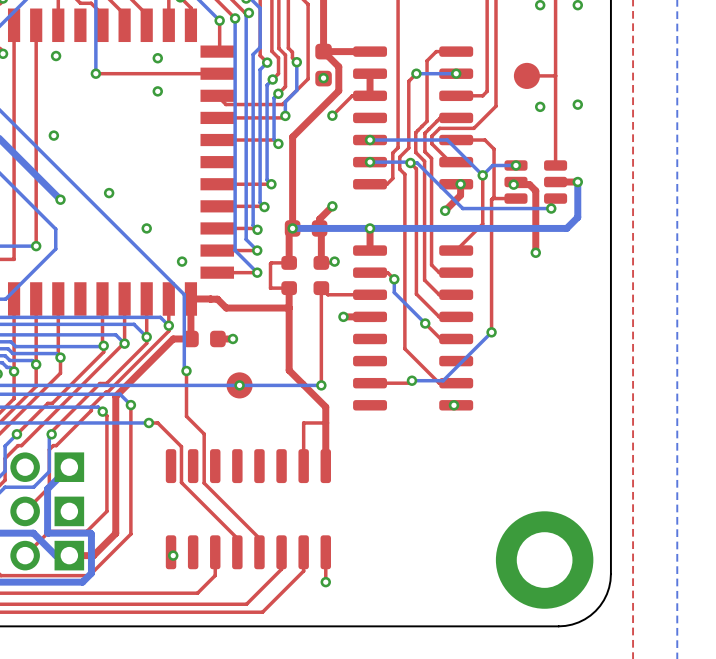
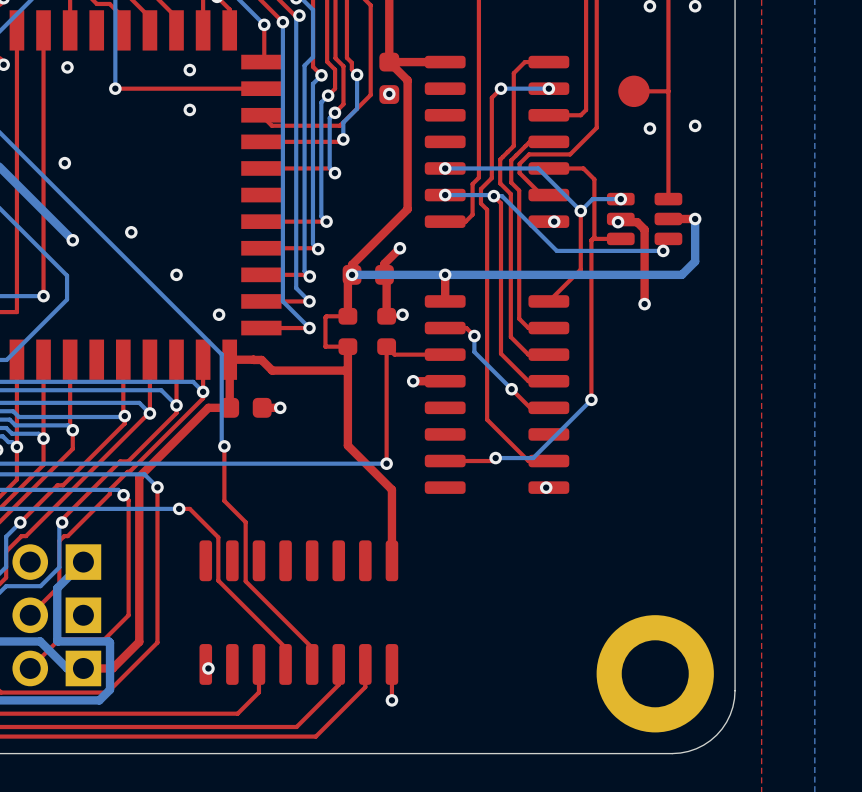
top track: (370, 73) (370, 95) (352, 95) (332, 115) -> none
top track: (338, 90) (292, 137) (292, 220) -> (407, 109) (407, 209) (352, 264)
via: (332, 115) -> none
top track: (460, 184) (460, 195) (445, 210) -> none
via: (445, 210) -> none
part: (239, 385) -> none
via: (239, 385) -> none
top track: (325, 422) (303, 422) (303, 466) -> none

